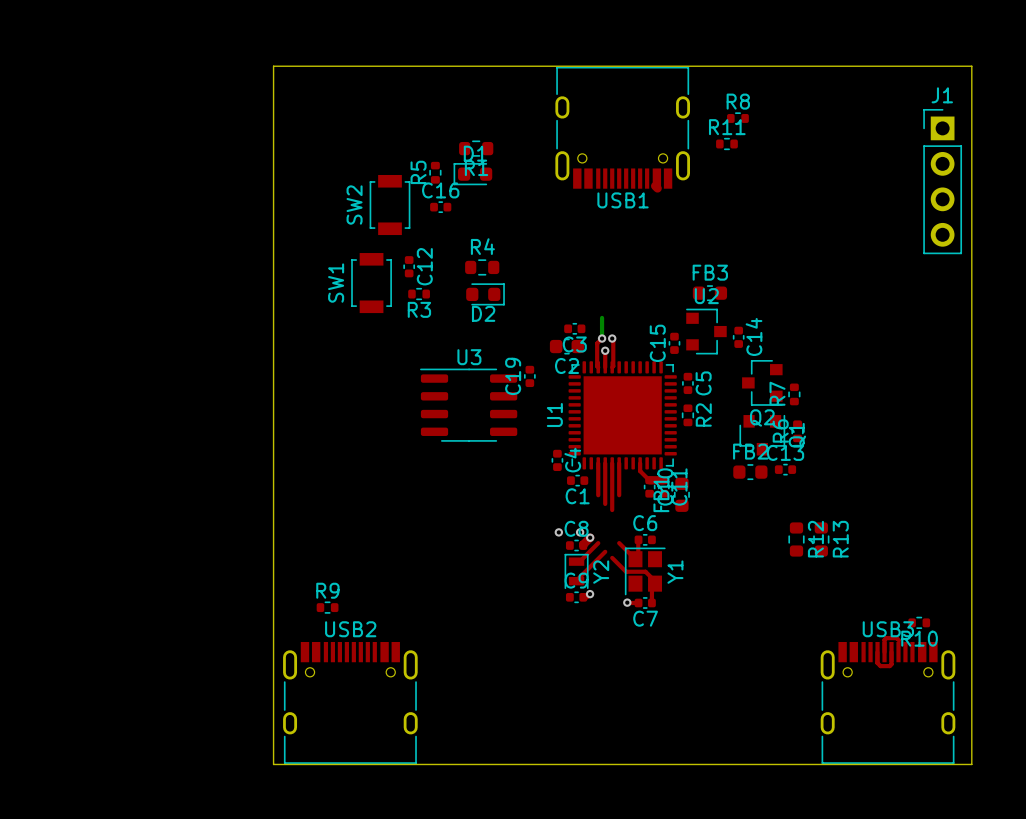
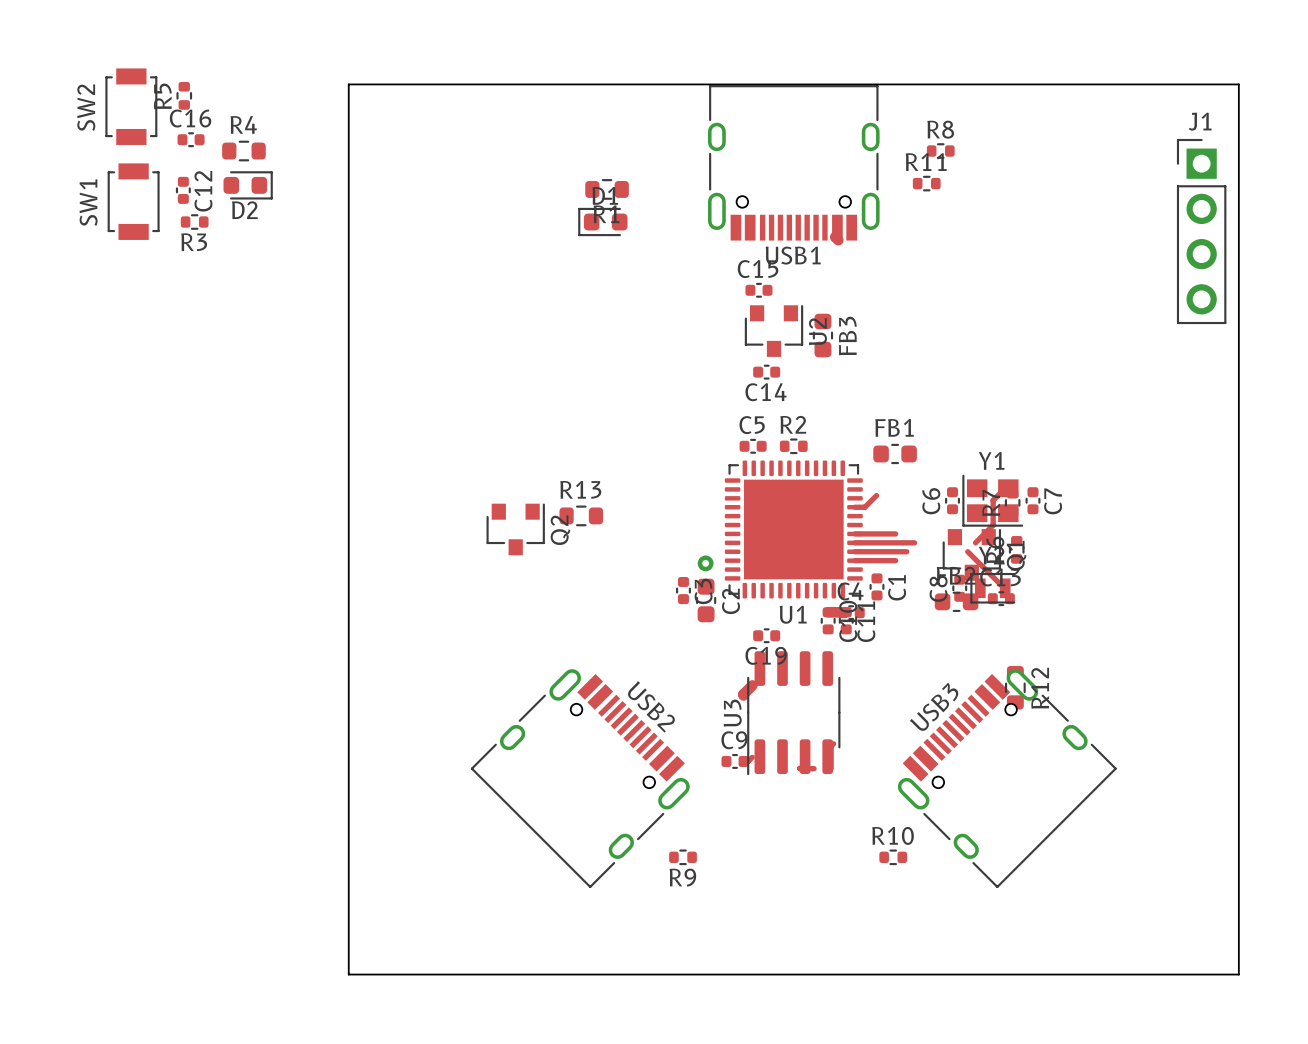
R5 position: (435, 172) -> (184, 95)
SW2 position: (390, 205) -> (131, 106)
C16 position: (440, 207) -> (191, 139)
C12 position: (409, 266) -> (183, 190)
R4 position: (482, 267) -> (243, 151)
SW1 position: (371, 283) -> (133, 201)
FB3 rotation: 0° (709, 293) -> 90° clockwise (822, 335)
FB3 position: (709, 293) -> (822, 335)
R3 position: (419, 294) -> (194, 222)
D2 position: (485, 294) -> (248, 185)
bottom track: (602, 317) (602, 338) -> none
C3 rotation: 0° (574, 328) -> 90° clockwise (683, 590)
C3 position: (574, 328) -> (683, 590)
U2 rotation: 0° (706, 331) -> 90° clockwise (774, 330)
U2 position: (706, 331) -> (774, 330)
C14 rotation: 0° (738, 337) -> 90° clockwise (766, 372)
C14 position: (738, 337) -> (766, 372)
top track: (602, 338) (597, 343) (598, 367) -> none
via: (602, 338) -> none
top track: (612, 338) (612, 367) -> none
via: (612, 338) -> none
C15 rotation: 0° (674, 343) -> 90° clockwise (758, 290)
C15 position: (674, 343) -> (758, 290)
C2 rotation: 0° (566, 346) -> 90° clockwise (706, 600)
C2 position: (566, 346) -> (706, 600)
top track: (605, 350) (605, 367) -> none
via: (605, 350) -> none
C2 name position: C2 (566, 365) -> C2 (730, 601)
C19 rotation: 0° (529, 376) -> 90° clockwise (766, 635)
C19 position: (529, 376) -> (766, 635)
Q2 rotation: 0° (762, 382) -> 90° counterclockwise (515, 529)
Q2 position: (762, 382) -> (515, 529)
C5 rotation: 0° (687, 383) -> 90° clockwise (753, 446)
C5 position: (687, 383) -> (753, 446)
top track: none -> (1008, 488) (1005, 488) (993, 500) (993, 525) (975, 542)
top track: none -> (876, 495) (864, 507) (854, 507)
U3 rotation: 0° (468, 405) -> 90° counterclockwise (793, 713)
U3 position: (468, 405) -> (793, 713)
U1 rotation: 0° (622, 415) -> 90° counterclockwise (793, 529)
R2 rotation: 0° (687, 415) -> 90° clockwise (793, 446)
R2 position: (687, 415) -> (793, 446)
top track: none -> (854, 533) (895, 533)
top track: none -> (854, 542) (914, 542)
top track: none -> (854, 551) (906, 551)
top track: none -> (967, 551) (1005, 588)
top track: none -> (854, 560) (895, 560)
via: none -> (705, 563)
C4 rotation: 0° (557, 460) -> 90° clockwise (851, 612)
C4 position: (557, 460) -> (851, 612)
top track: (598, 463) (598, 495) -> none
top track: (605, 463) (605, 503) -> none
top track: (612, 463) (612, 510) -> none
top track: (619, 463) (619, 495) -> none
top track: (640, 463) (640, 471) (649, 480) -> none
C1 rotation: 0° (577, 480) -> 90° clockwise (876, 586)
C1 position: (577, 480) -> (876, 586)
FB1 rotation: 0° (681, 494) -> 90° clockwise (895, 453)
FB1 position: (681, 494) -> (895, 453)
via: (558, 532) -> none
via: (580, 532) -> none
via: (590, 537) -> none
top track: (638, 539) (638, 556) (635, 559) (619, 543) -> none
C6 rotation: 0° (645, 539) -> 90° clockwise (952, 500)
C6 position: (645, 539) -> (952, 500)
R13 rotation: 0° (821, 539) -> 90° clockwise (581, 515)
R13 position: (821, 539) -> (581, 515)
R13 name position: R13 (840, 539) -> R13 (580, 489)
top track: (598, 543) (579, 561) (576, 561) -> none
C8 rotation: 0° (576, 545) -> 90° clockwise (959, 588)
C8 position: (576, 545) -> (959, 588)
top track: (605, 551) (576, 581) -> none
top track: (612, 557) (626, 571) (645, 571) (654, 581) (654, 583) -> none
Y2 rotation: 0° (576, 571) -> 90° counterclockwise (992, 588)
Y2 position: (576, 571) -> (992, 588)
Y1 rotation: 0° (645, 571) -> 90° counterclockwise (992, 500)
Y1 position: (645, 571) -> (992, 500)
R9 name position: R9 (327, 590) -> R9 (682, 877)
via: (590, 594) -> none
via: (627, 602) -> none
C7 rotation: 0° (645, 602) -> 90° clockwise (1033, 500)
C7 position: (645, 602) -> (1033, 500)
R9 position: (327, 607) -> (683, 857)
R10 position: (919, 622) -> (893, 857)
R10 name position: R10 (919, 638) -> R10 (893, 835)
top track: (899, 640) (896, 638) (886, 638) (884, 639) (884, 652) -> none
top track: (891, 652) (891, 664) (889, 666) (880, 666) (877, 662) (877, 652) -> none
USB2 rotation: 0° (350, 702) -> 45° clockwise (580, 778)
USB2 position: (350, 702) -> (580, 778)
USB3 rotation: 0° (888, 702) -> 45° counterclockwise (1007, 778)
USB3 position: (888, 702) -> (1007, 778)

